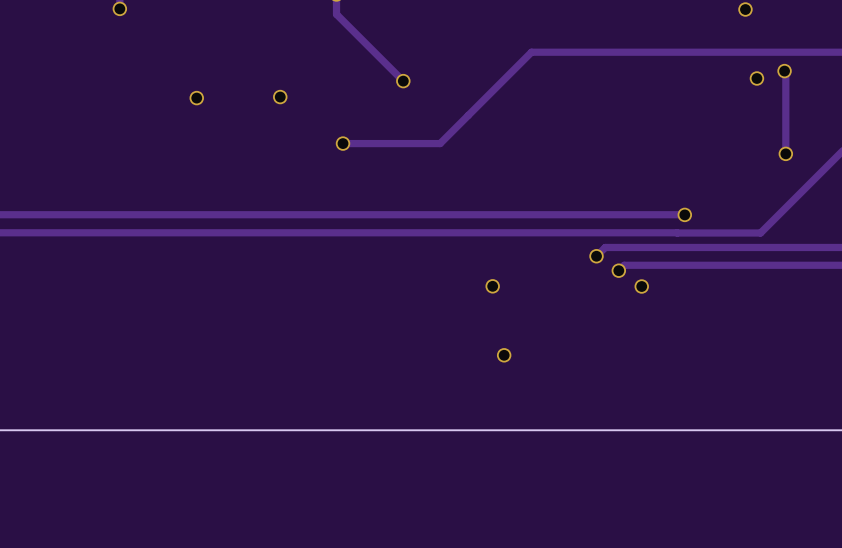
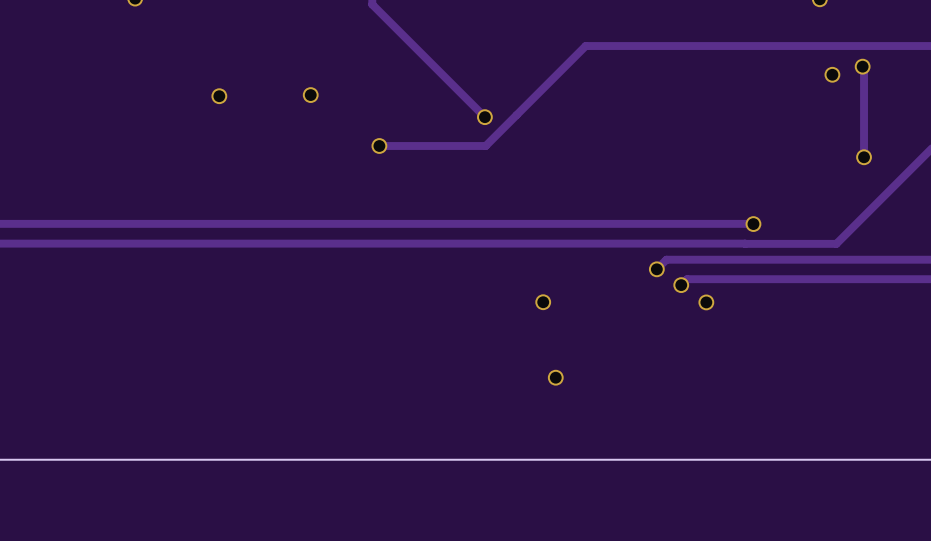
track: none -> (445, 77) (484, 117)
via position: (403, 81) -> (484, 117)

